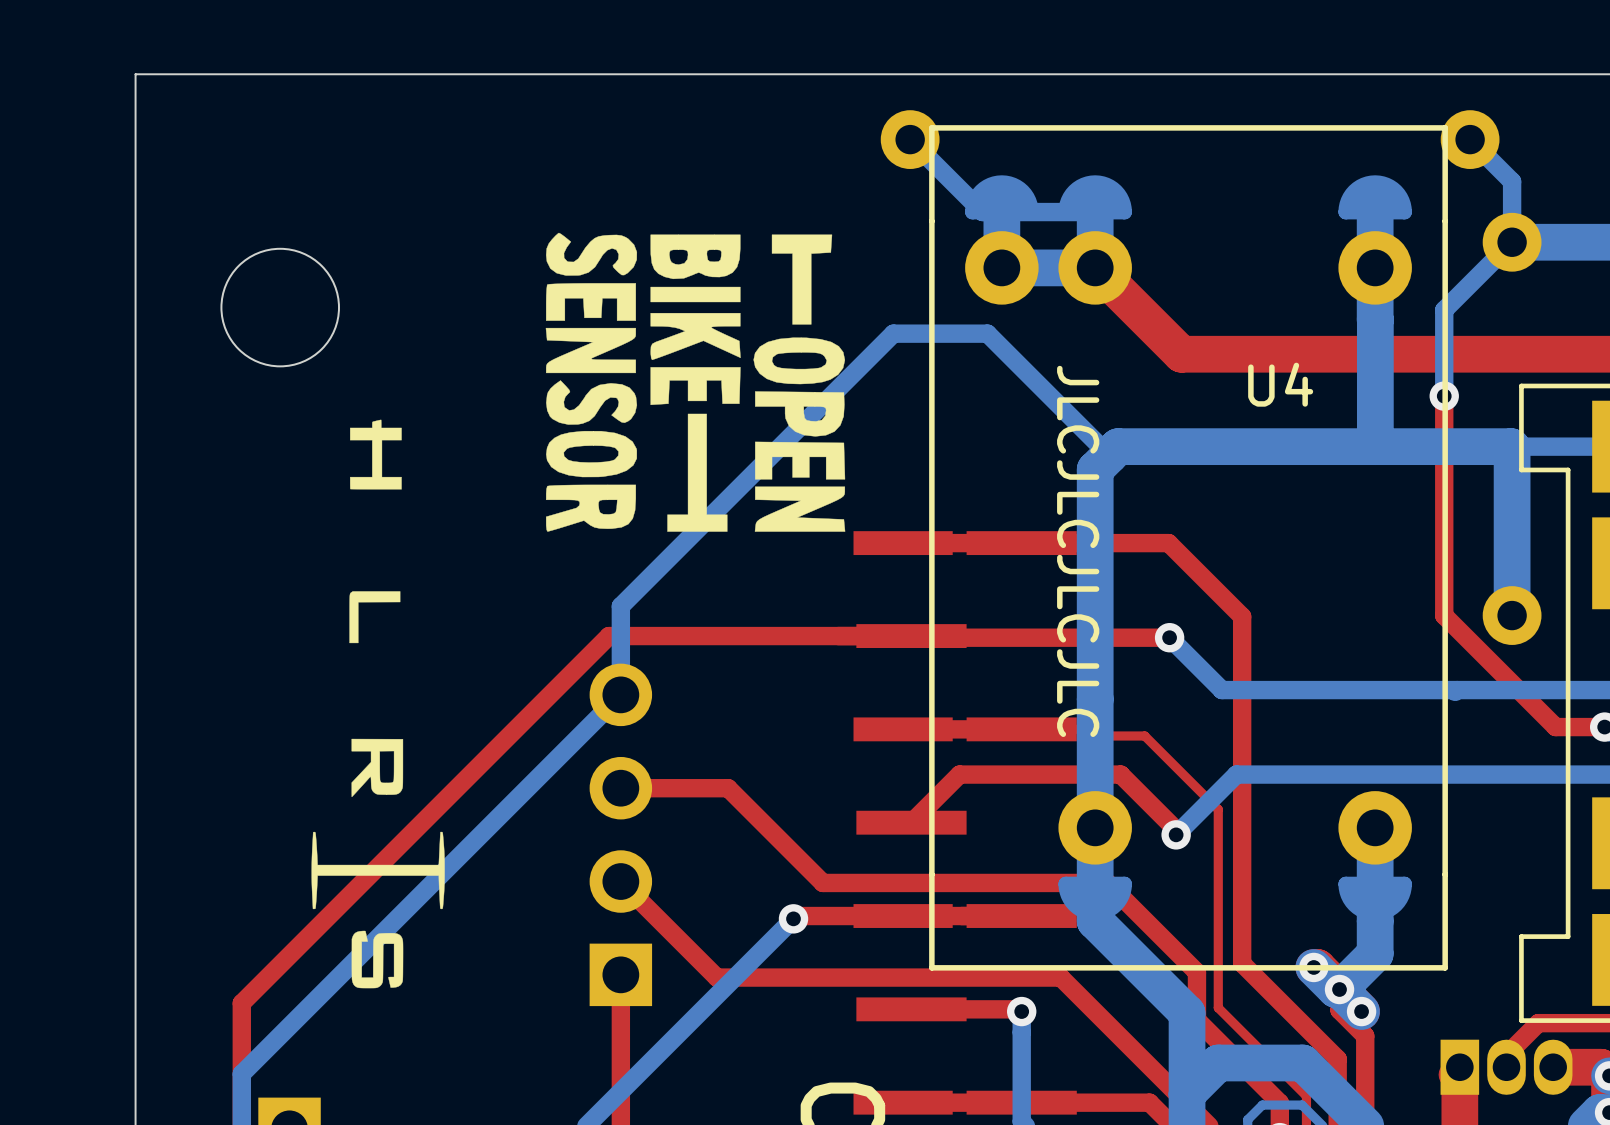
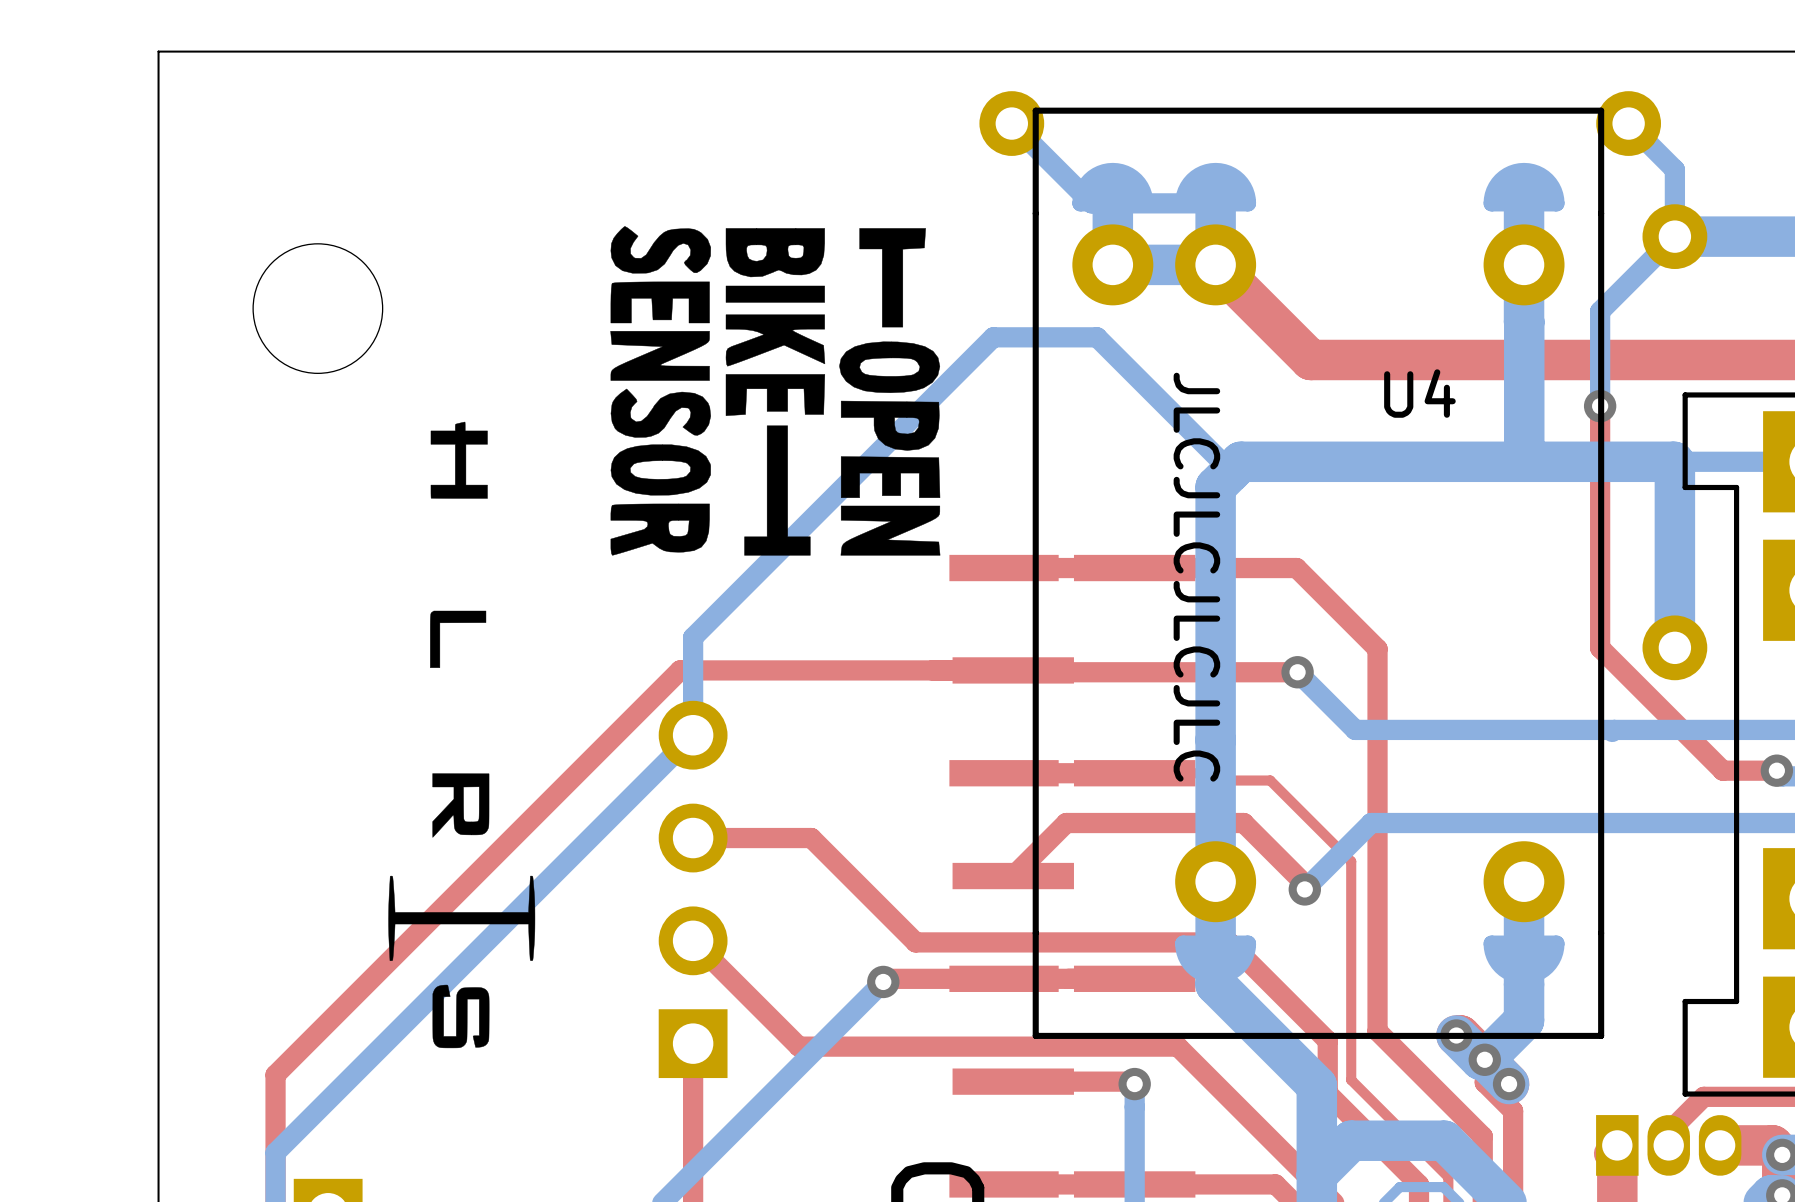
drawing position: (378, 703) -> (461, 734)

